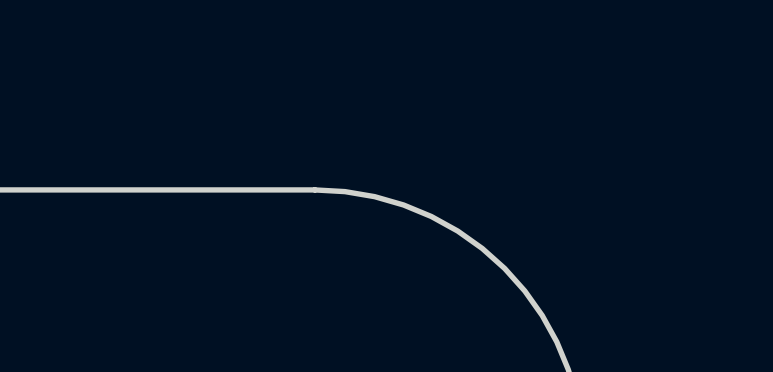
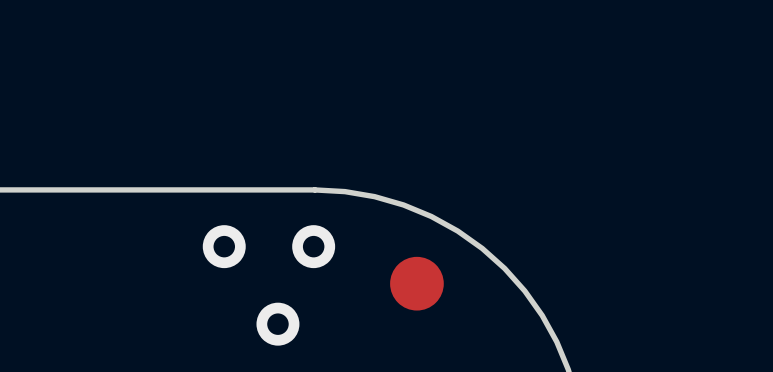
via: none -> (224, 246)
via: none -> (313, 246)
part: none -> (416, 283)
via: none -> (277, 324)

